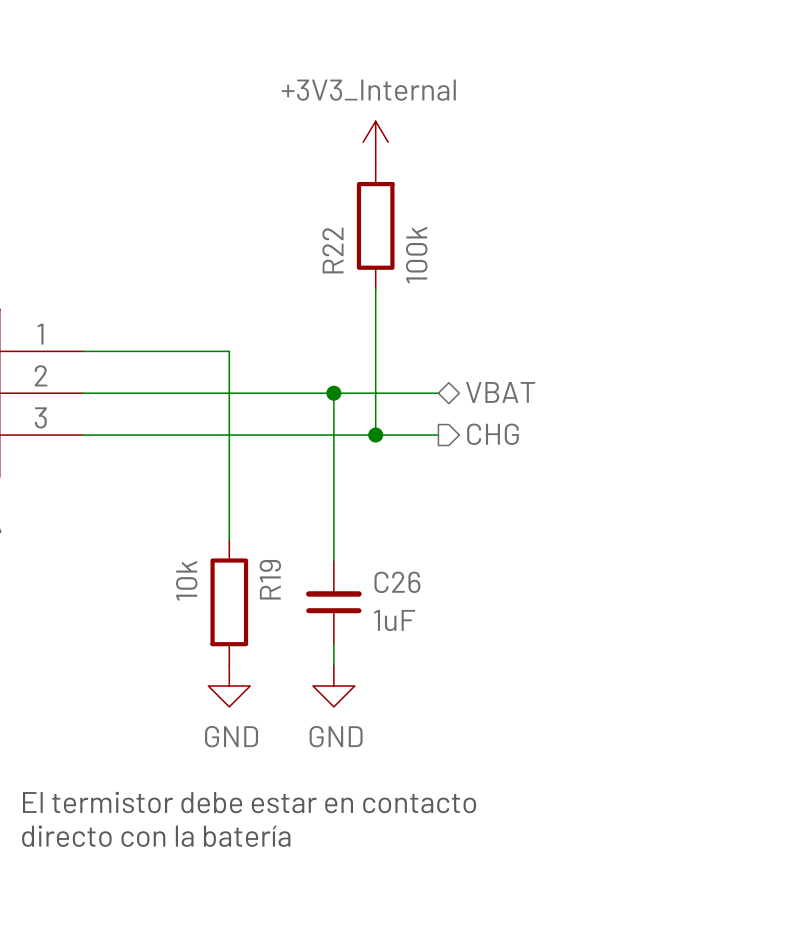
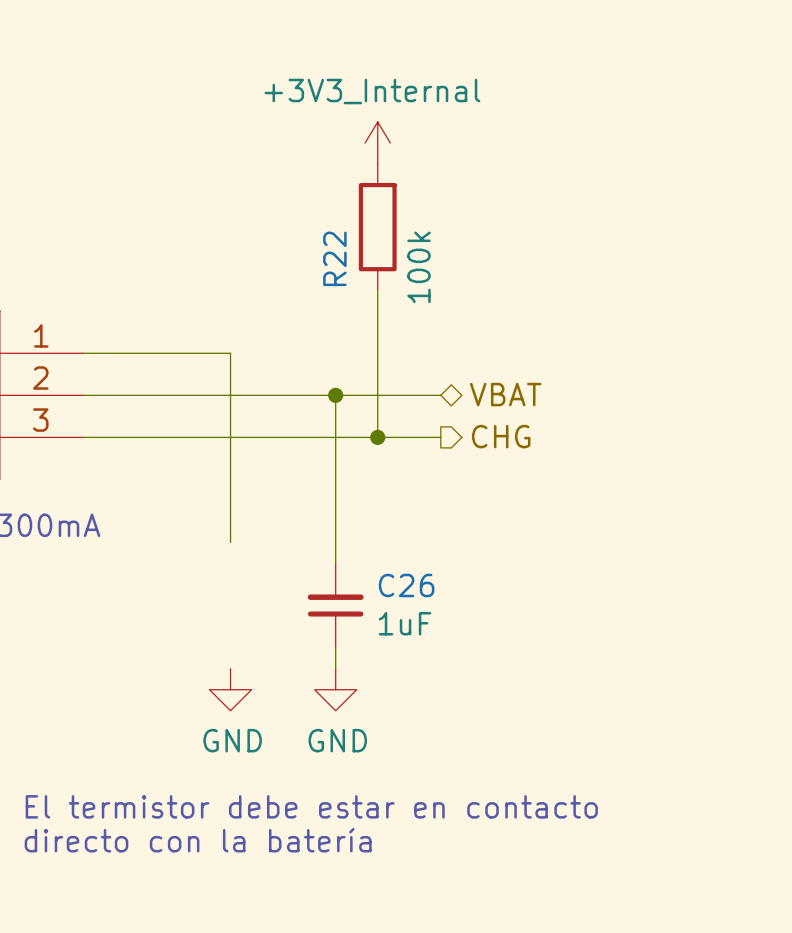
R19: 10k (229, 602) -> none

